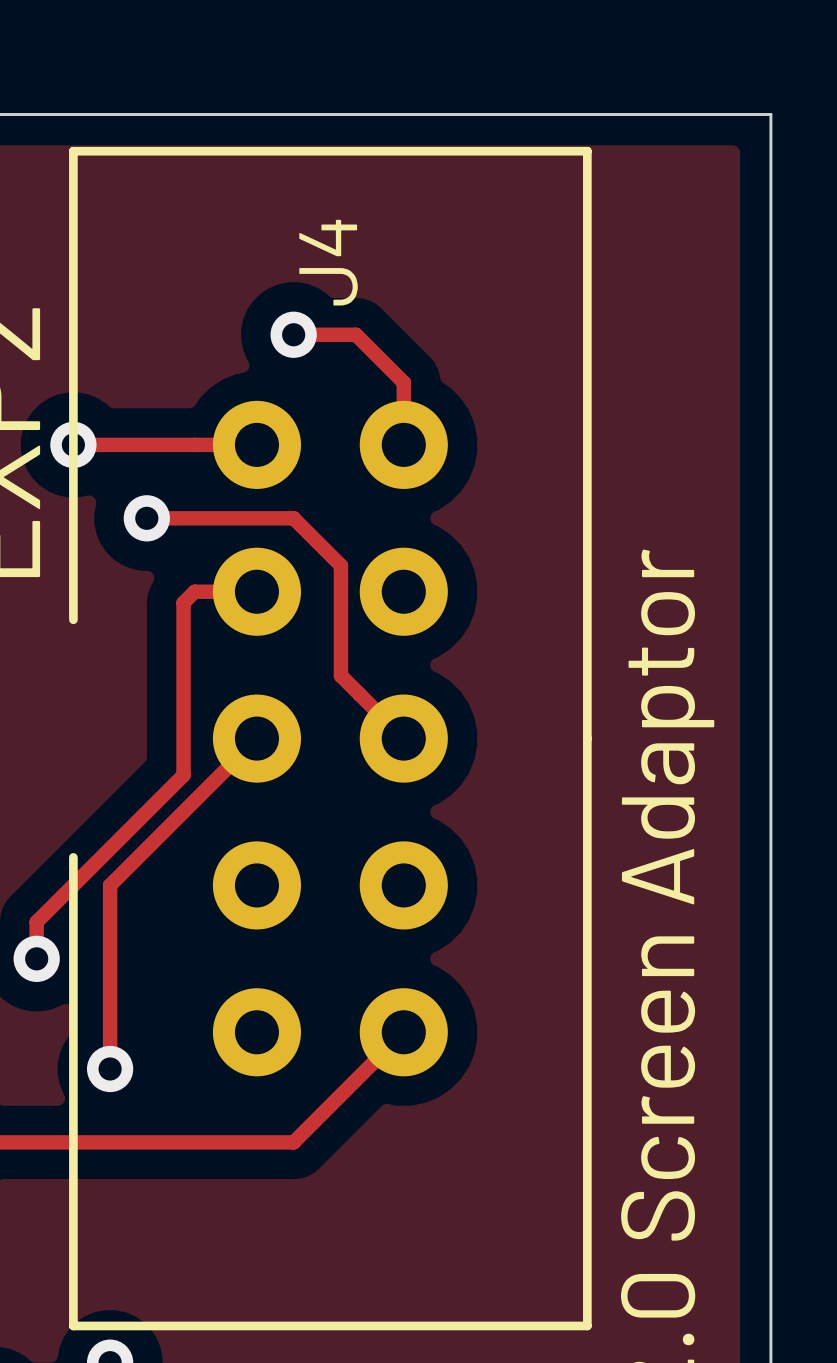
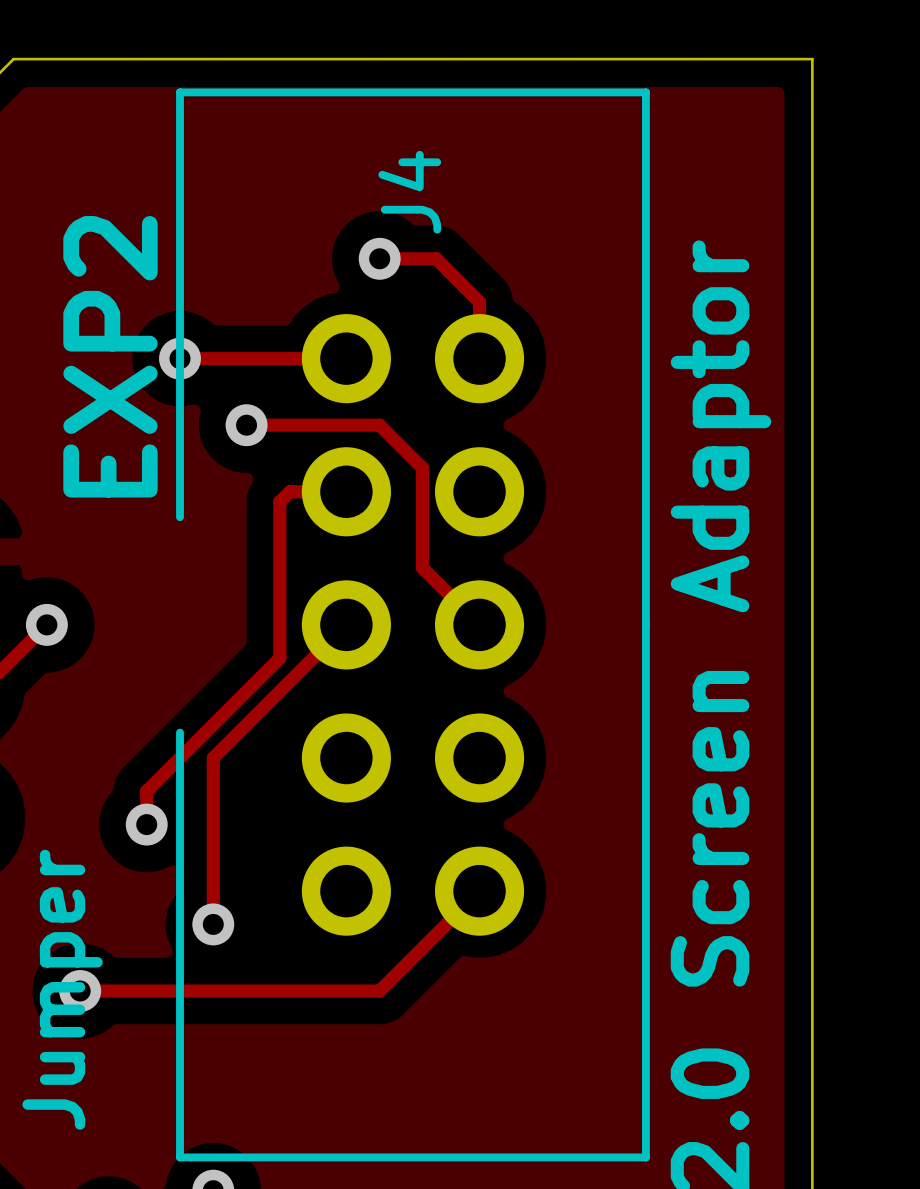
J4 footprint: [69, 146, 592, 1331] -> [176, 88, 650, 1162]

